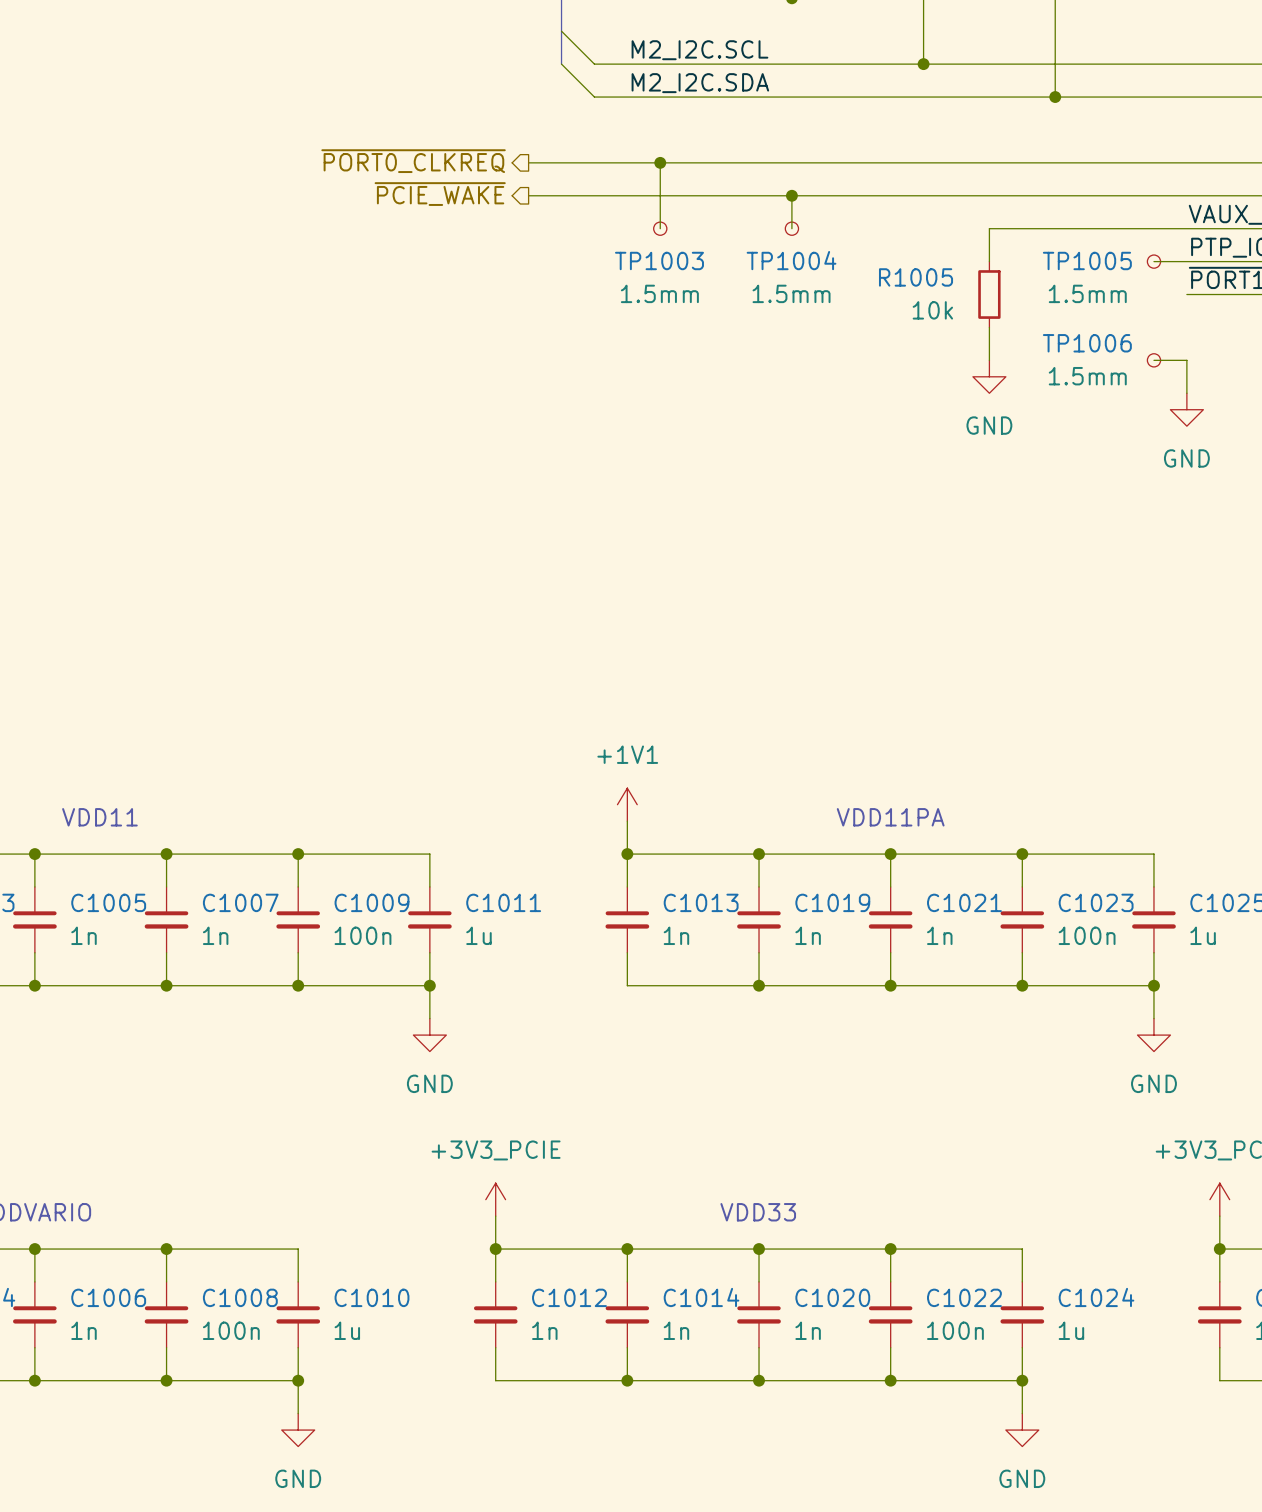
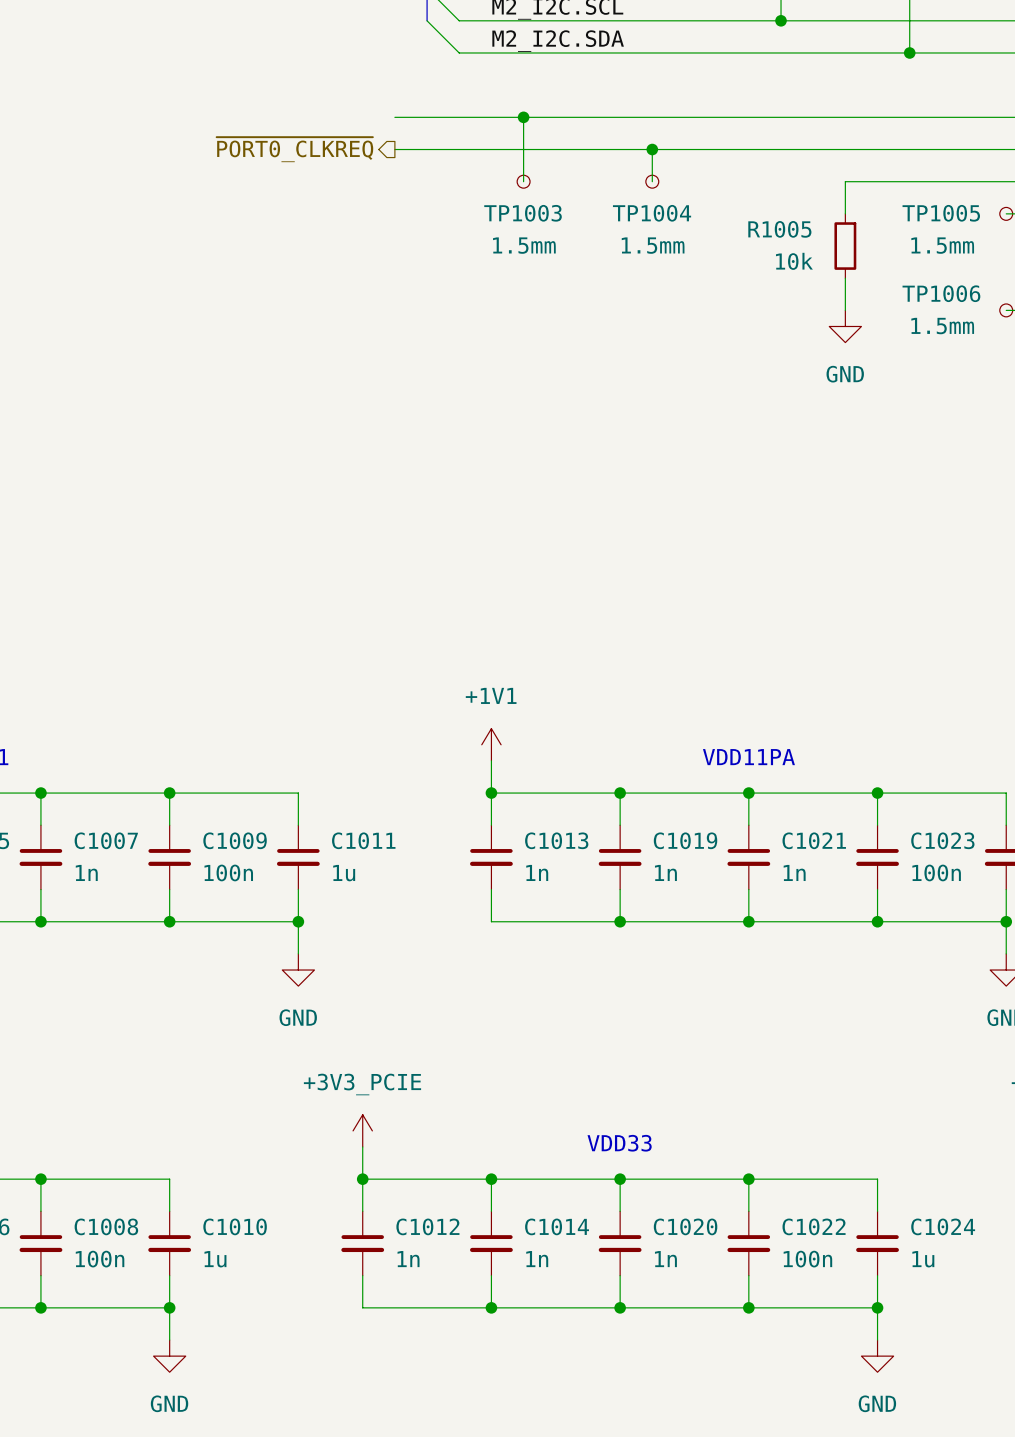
hierarchical label: ~{PORT0_CLKREQ} (413, 161) -> none
hierarchical label: ~{PCIE_WAKE} (440, 194) -> ~{PORT0_CLKREQ} (294, 149)

